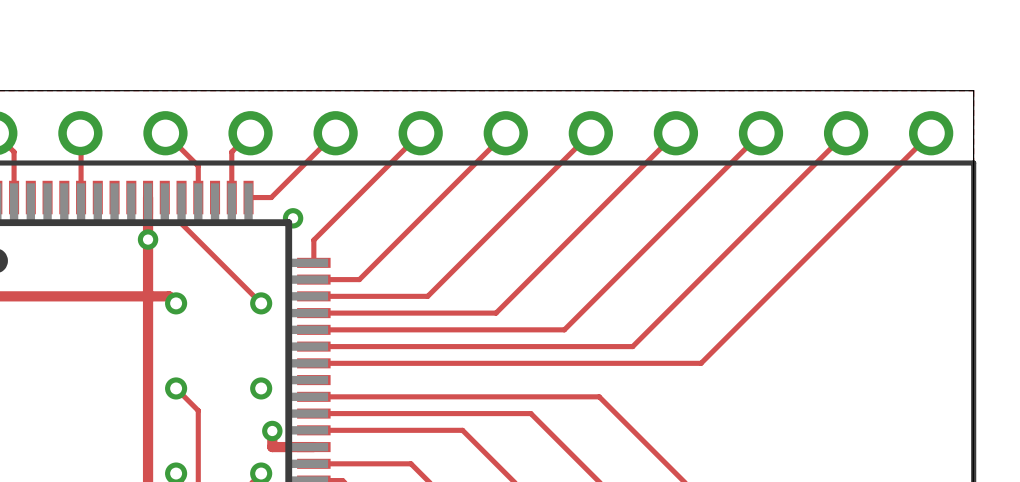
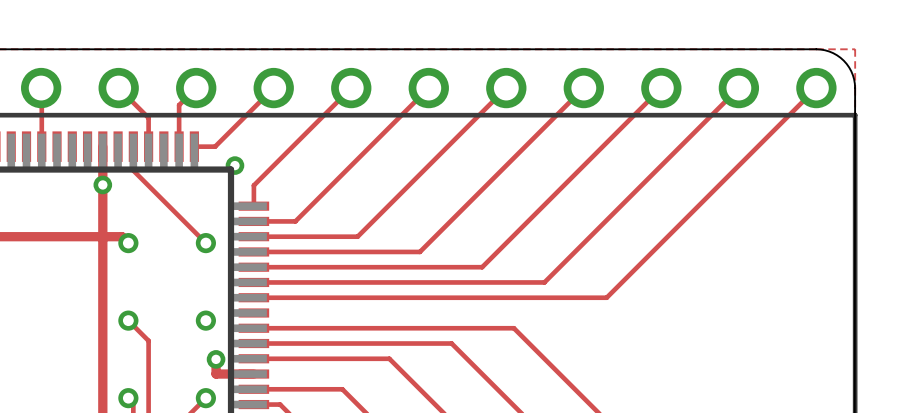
board edge: (931, 90) (973, 90) (973, 133) -> (816, 49) (833, 53) (843, 60) (851, 71) (855, 88)

